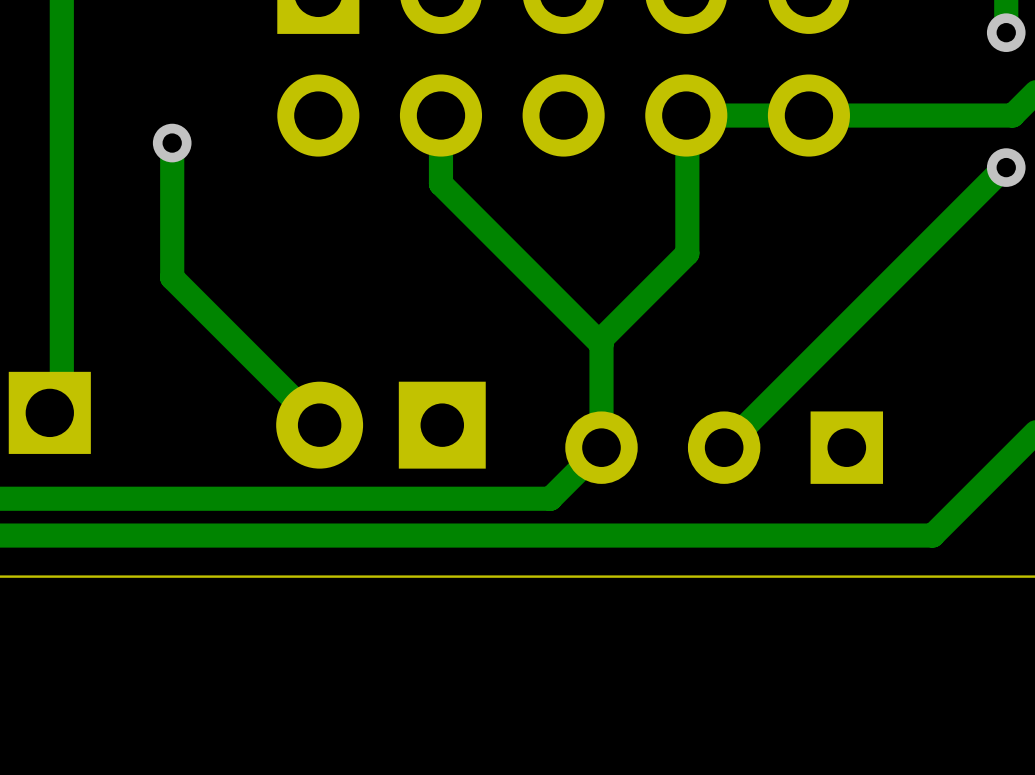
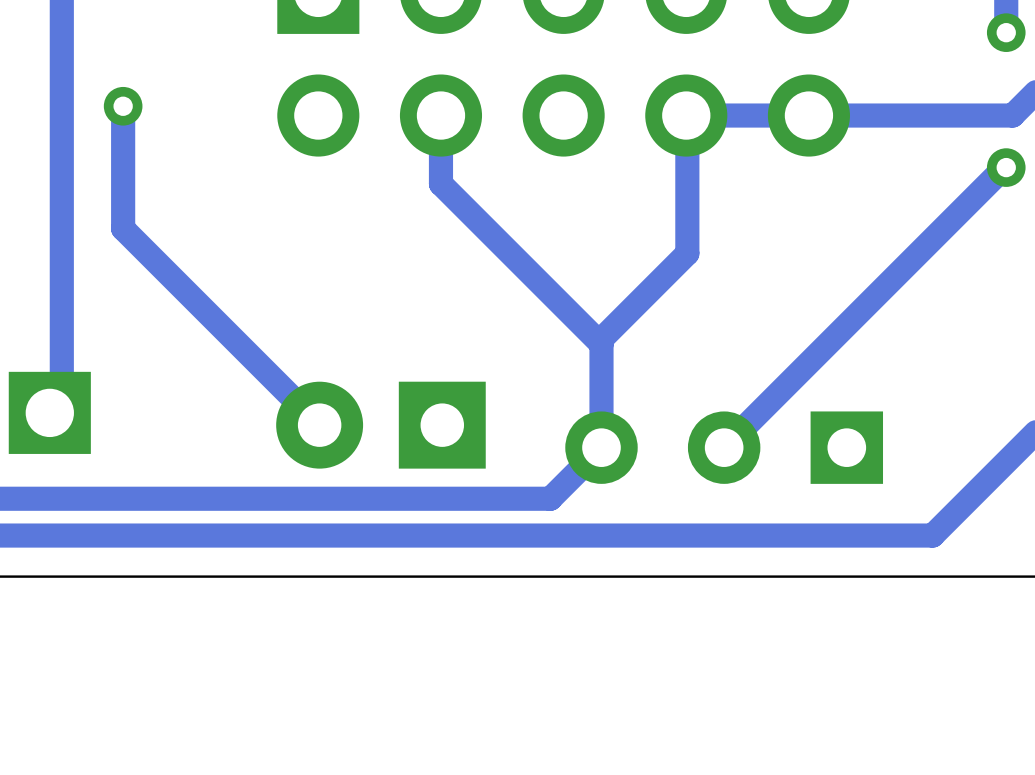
track: (172, 143) (172, 277) -> (123, 106) (123, 228) (172, 277)
via position: (172, 143) -> (123, 106)

